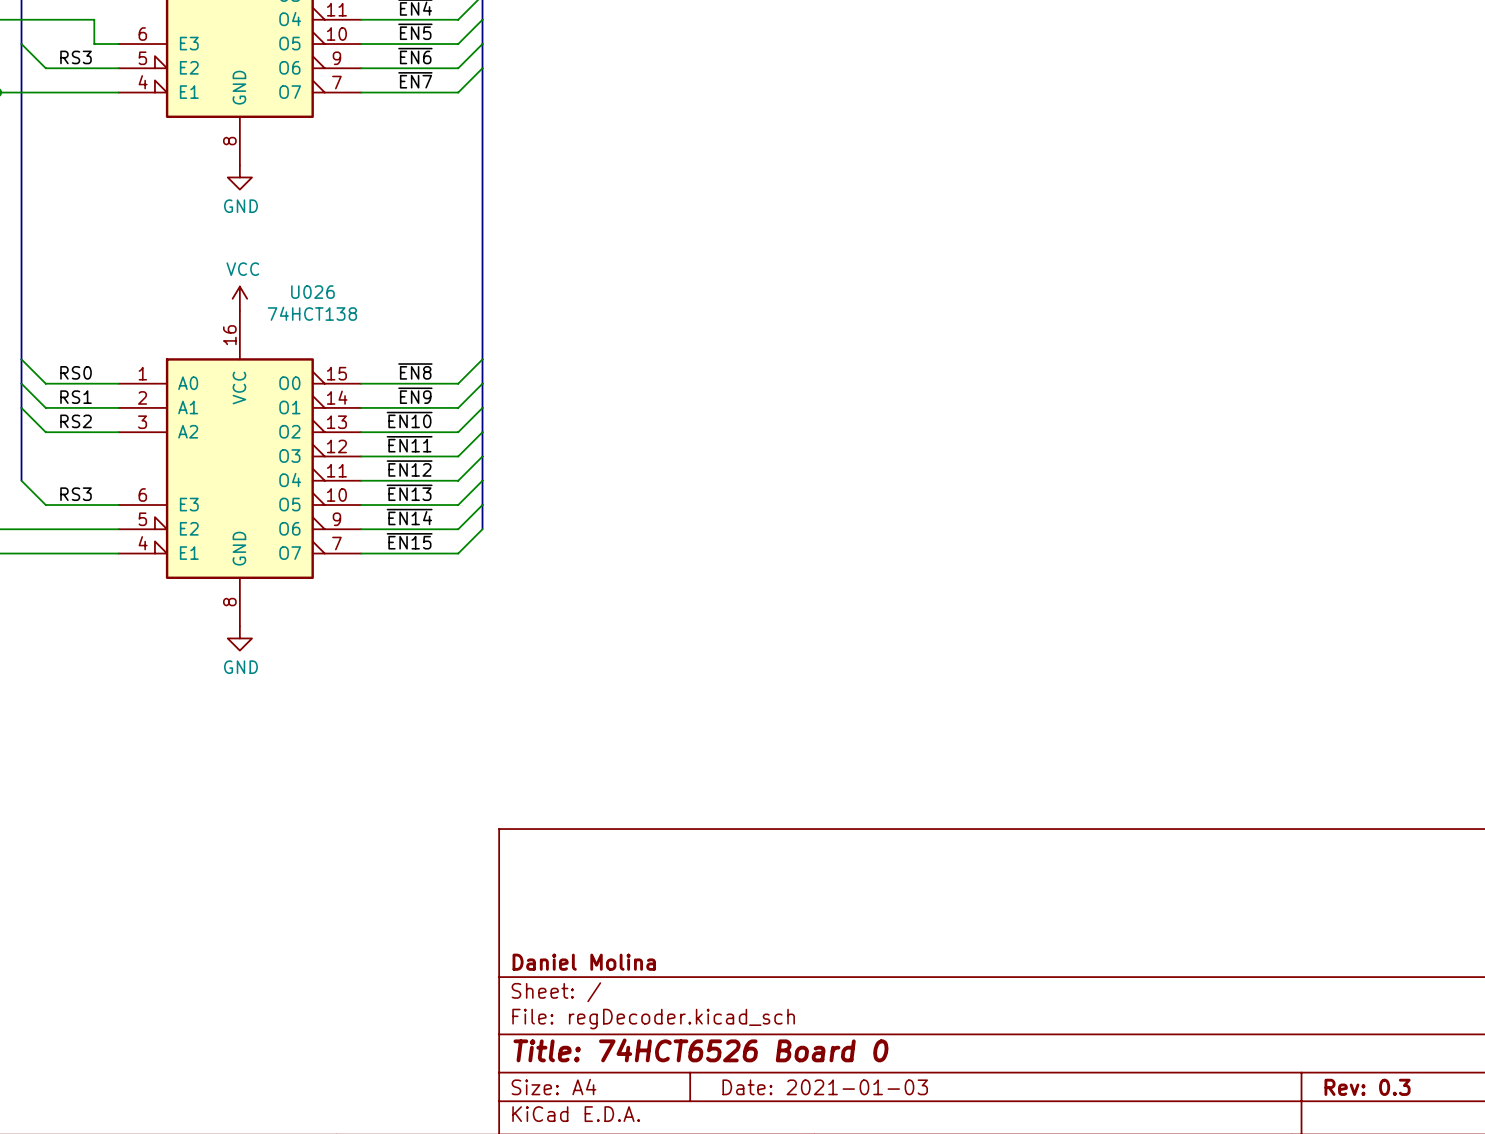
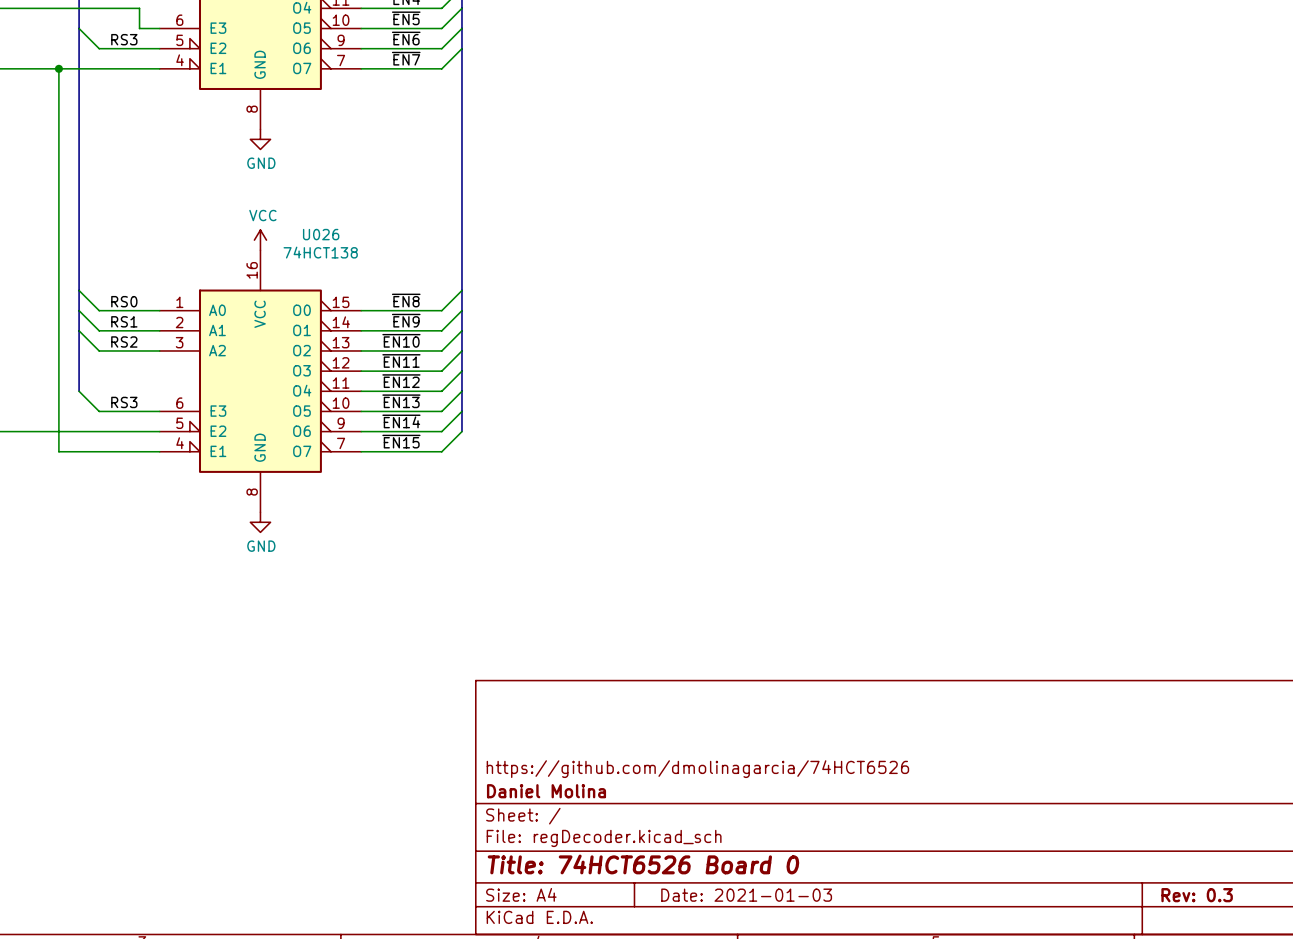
title block: none -> https://github.com/dmolinagarcia/74HCT6526 (697, 769)

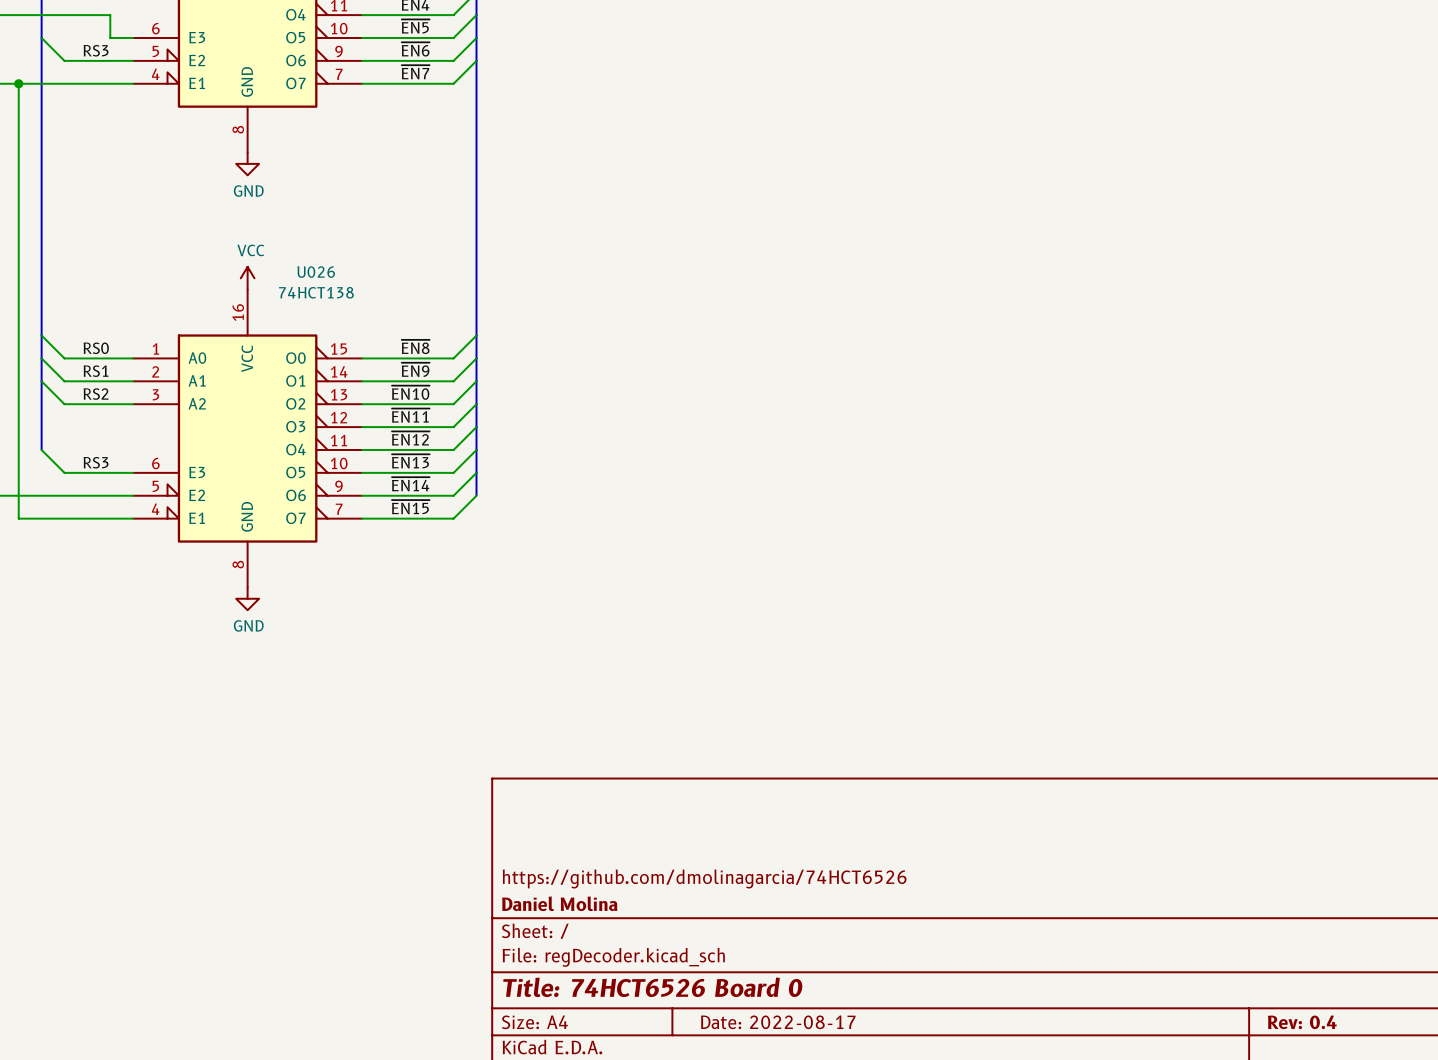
title block: Date: 2021-01-03 (746, 895) -> Date: 2022-08-17 (778, 1022)
title block: Rev: 0.3 (1197, 895) -> Rev: 0.4 (1302, 1022)

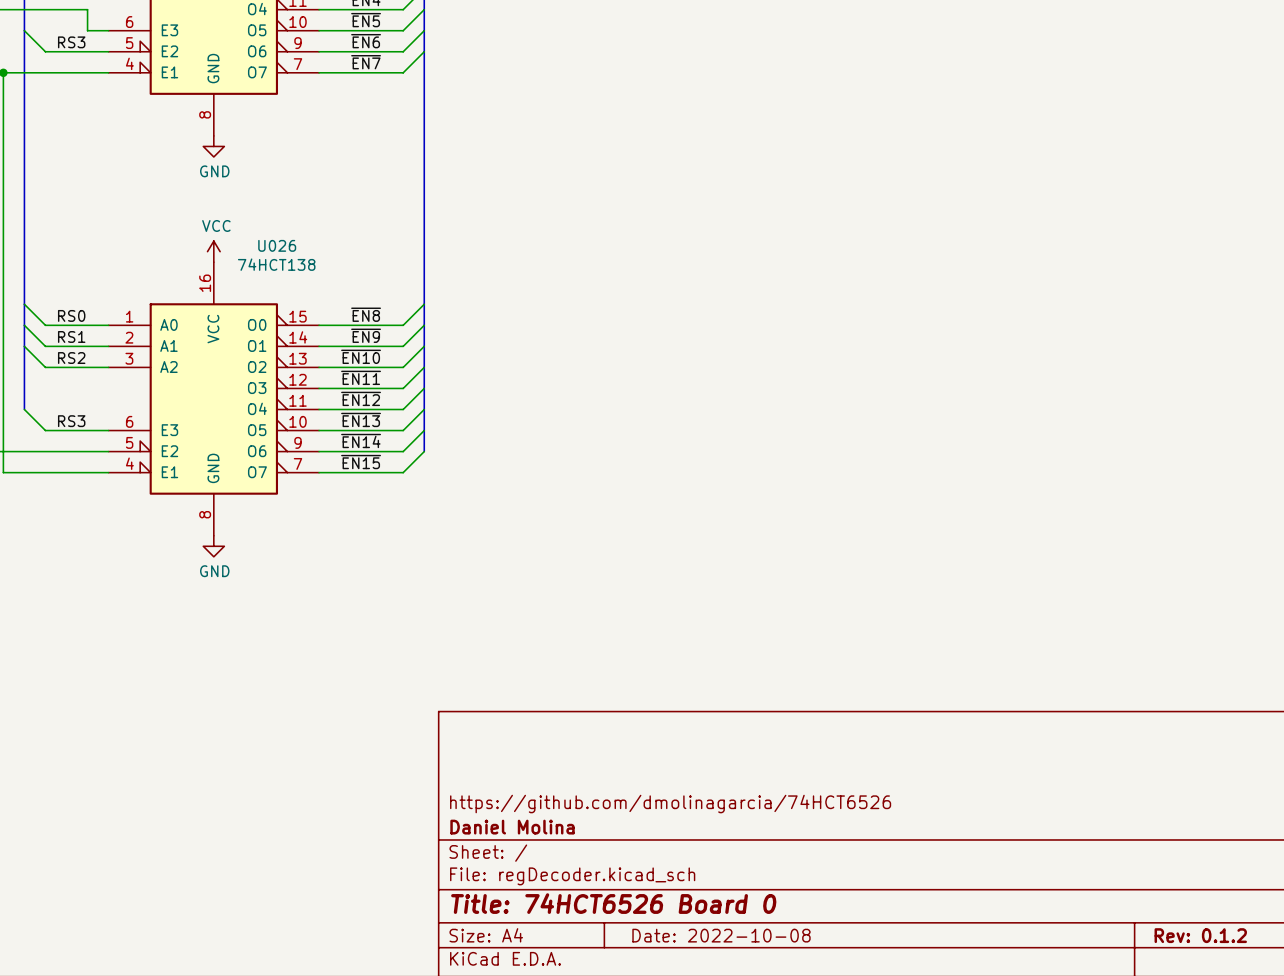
title block: Date: 2022-08-17 (778, 1022) -> Date: 2022-10-08 (721, 935)
title block: Rev: 0.4 (1302, 1022) -> Rev: 0.1.2 (1200, 935)

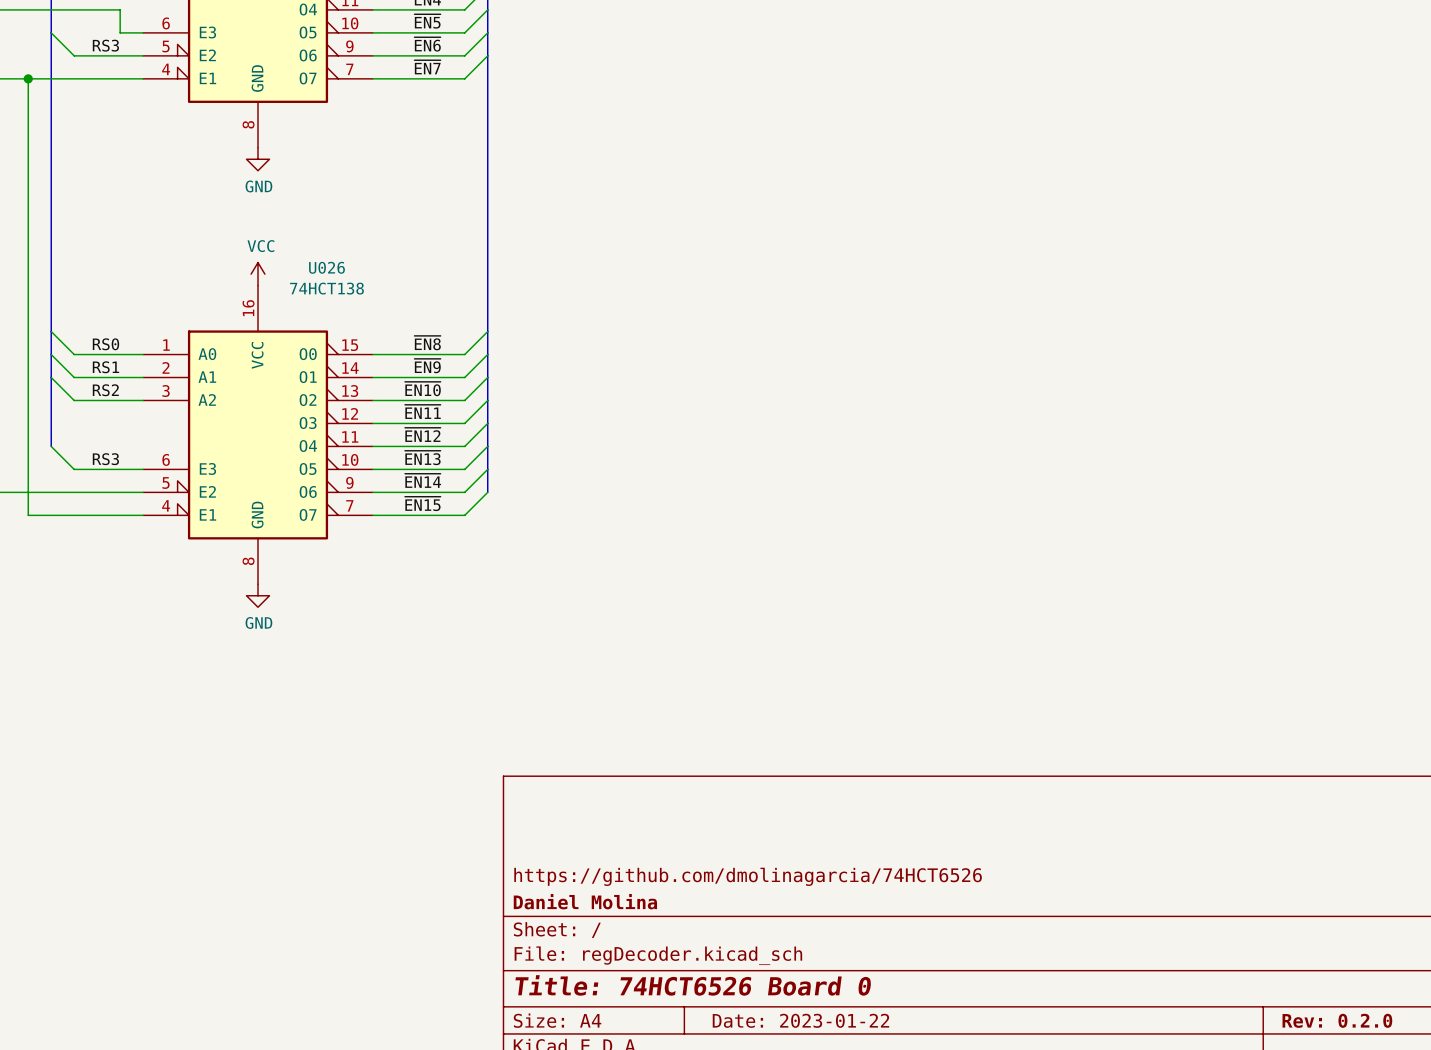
title block: Date: 2022-10-08 (721, 935) -> Date: 2023-01-22 (800, 1020)
title block: Rev: 0.1.2 (1200, 935) -> Rev: 0.2.0 (1337, 1020)

